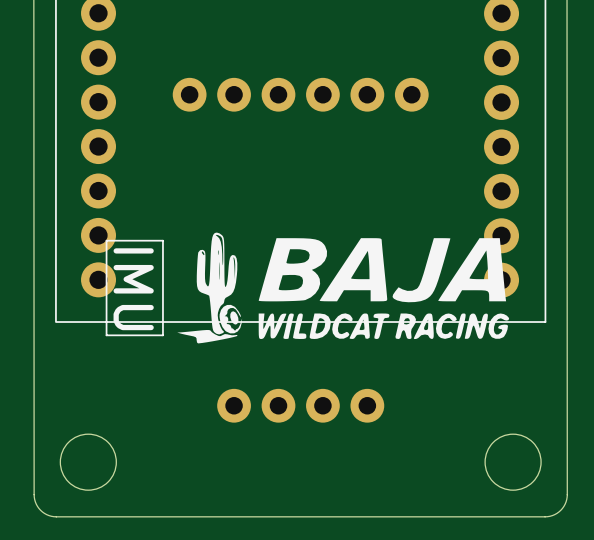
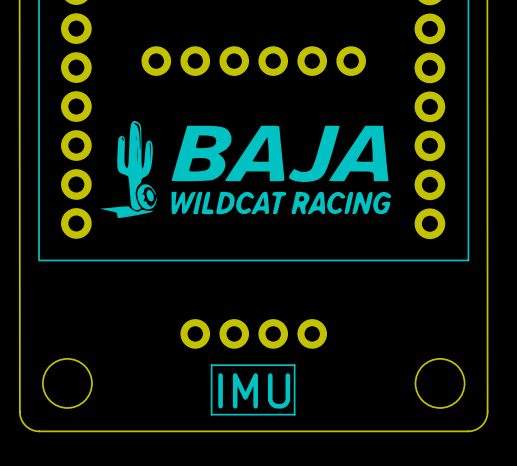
line: (106, 240) (162, 240) (162, 335) (106, 335) (106, 240) -> none
drawing position: (343, 288) -> (245, 169)
text rotation: 0° (133, 289) -> 90° counterclockwise (254, 390)
text position: IMU (133, 289) -> IMU (254, 390)
line: none -> (211, 365) (294, 365) (294, 414) (211, 414) (211, 365)

